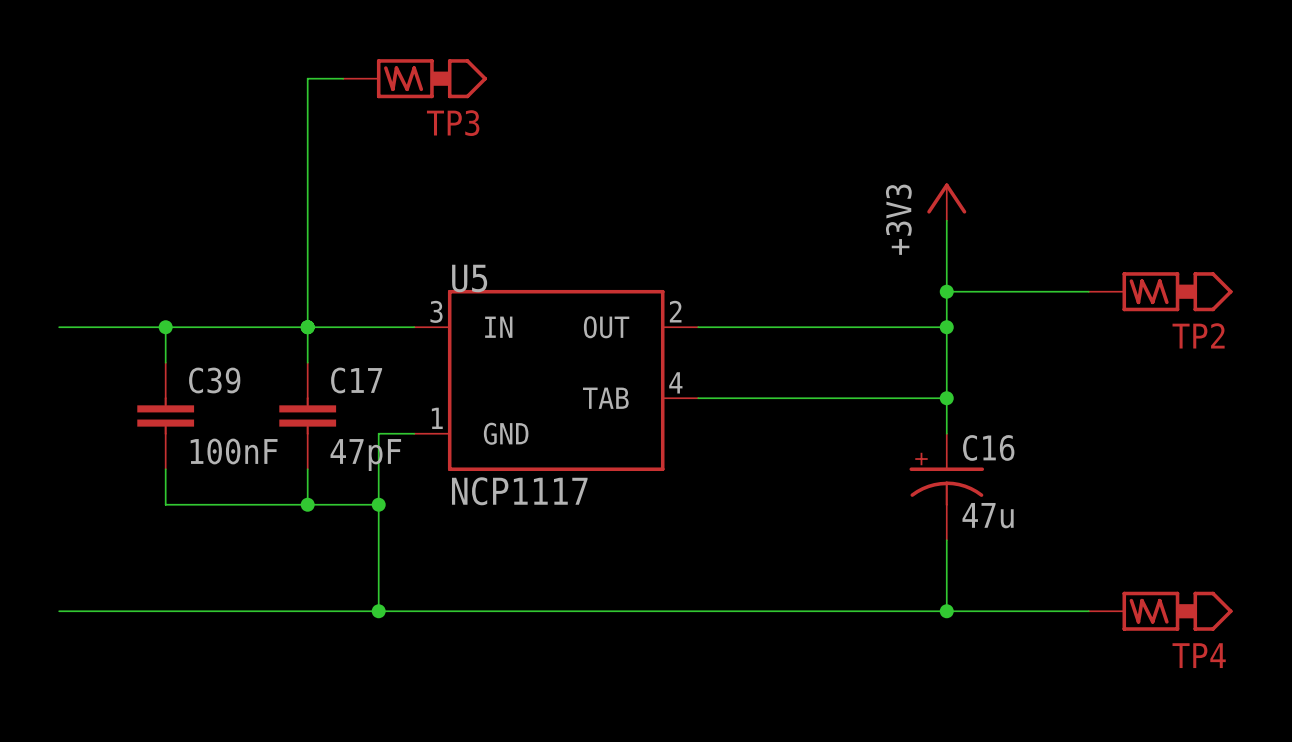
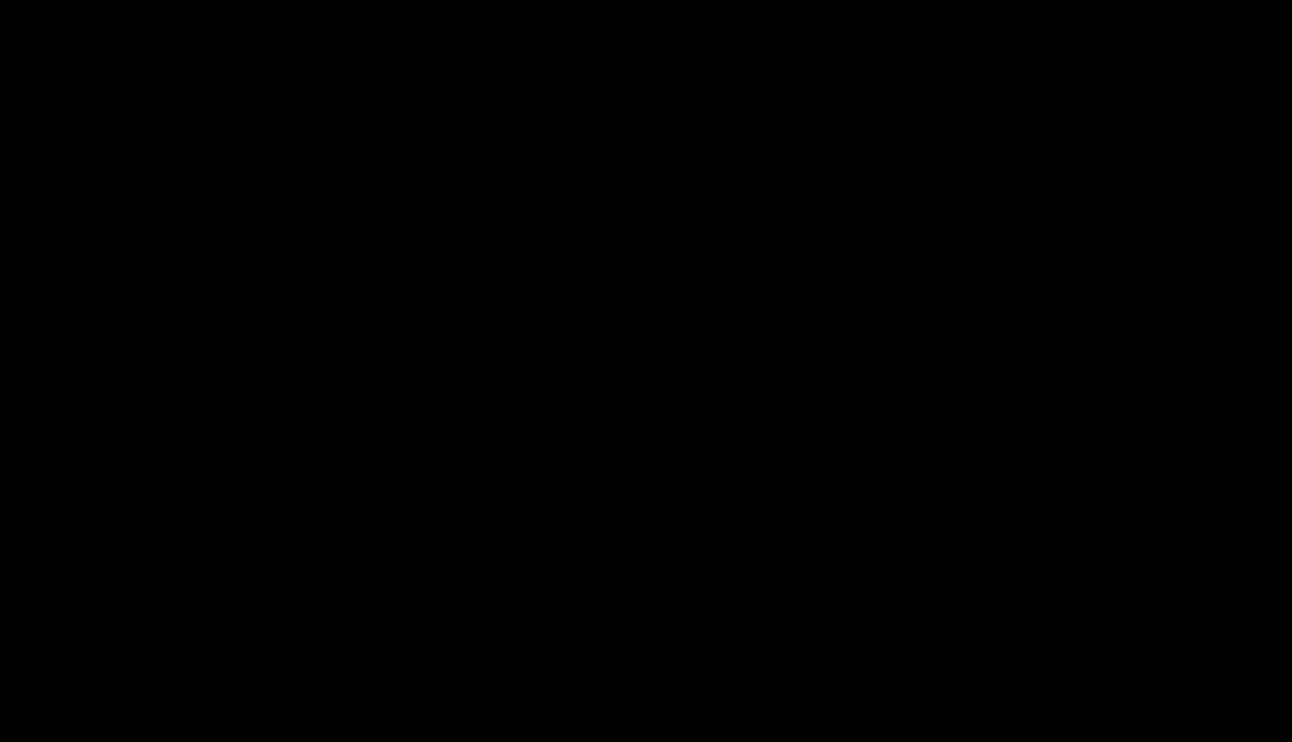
wire: (343, 78) (307, 78) (307, 362) -> none
TP3: (415, 78) -> none
power symbol: +3V3 (946, 202) -> none
wire: (946, 220) (946, 433) -> none
wire: (946, 291) (1088, 291) -> none
junction: (946, 291) -> none
TP2: (1160, 291) -> none
wire: (59, 327) (414, 327) -> none
wire: (165, 327) (165, 362) -> none
junction: (165, 327) -> none
junction: (307, 327) -> none
wire: (698, 327) (946, 327) -> none
junction: (946, 327) -> none
U5: NCP1117 (556, 380) -> none
wire: (698, 398) (946, 398) -> none
junction: (946, 398) -> none
C39: 100nF (165, 415) -> none
C17: 47pF (307, 415) -> none
wire: (414, 433) (378, 433) (378, 611) -> none
wire: (165, 469) (165, 504) (378, 504) -> none
wire: (307, 469) (307, 504) -> none
C16: 47u (946, 486) -> none
junction: (307, 504) -> none
junction: (378, 504) -> none
wire: (946, 540) (946, 611) -> none
wire: (59, 611) (1088, 611) -> none
junction: (378, 611) -> none
junction: (946, 611) -> none
TP4: (1160, 611) -> none

